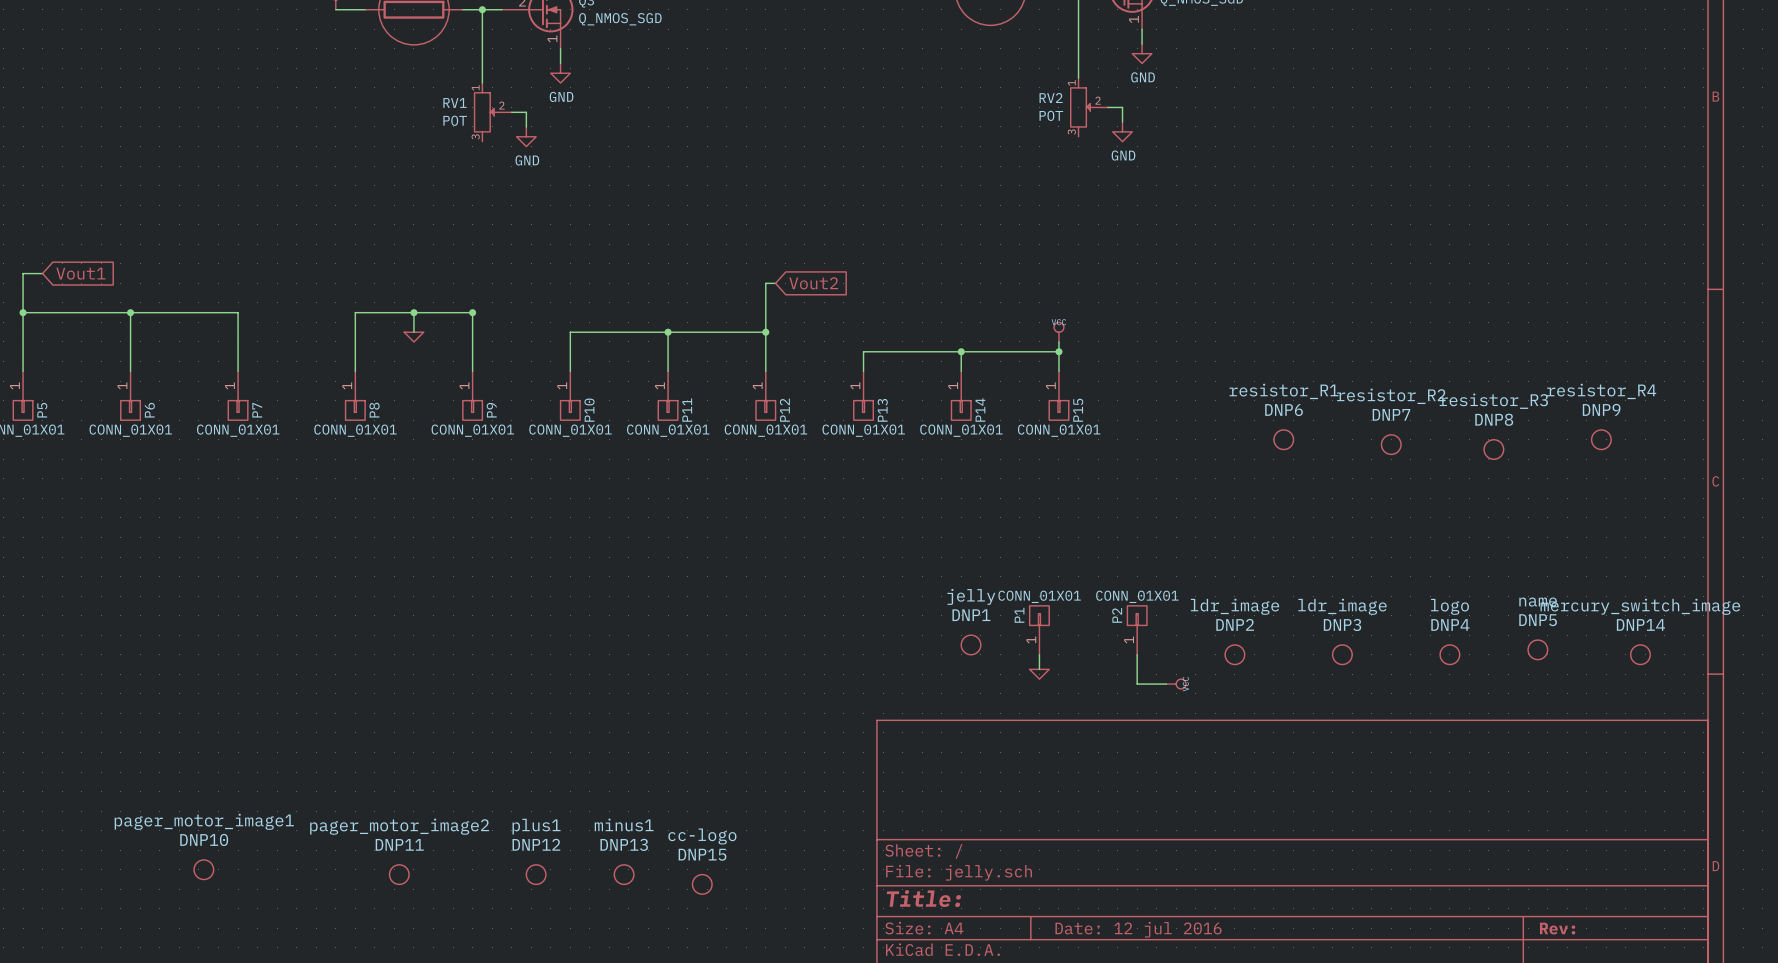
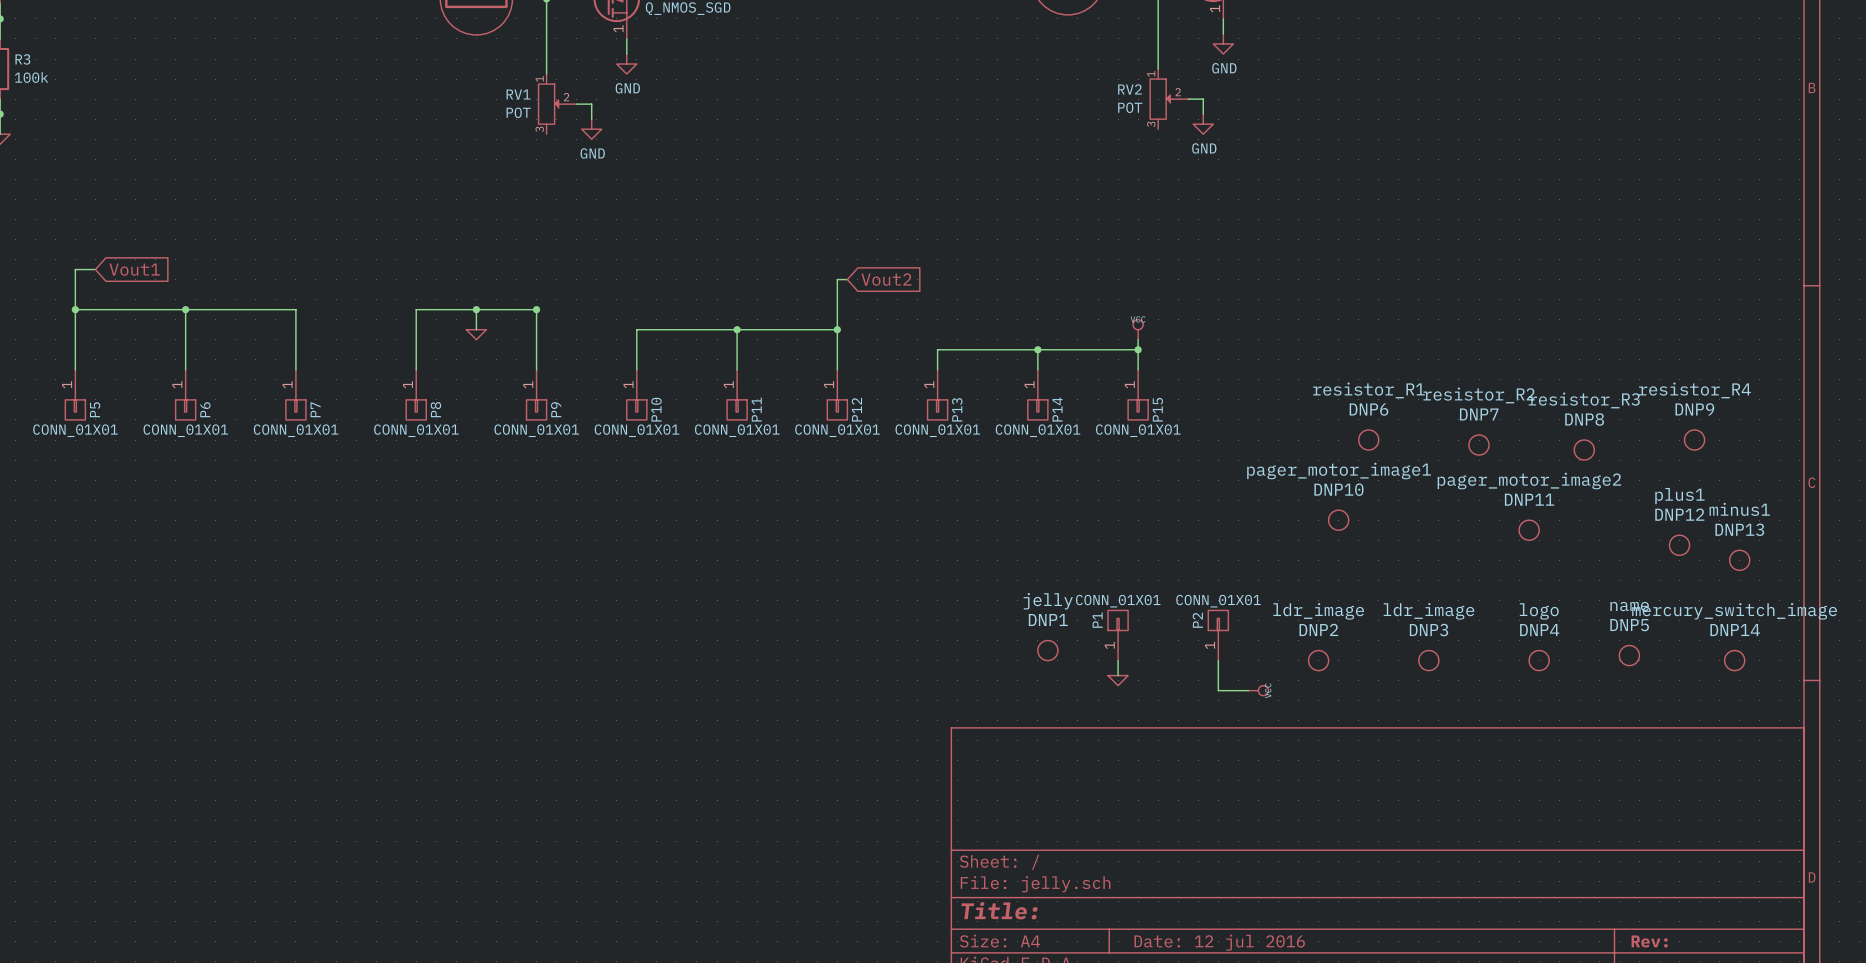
DNP10 position: (203, 869) -> (1338, 520)
DNP11 position: (399, 874) -> (1529, 530)
DNP12 position: (536, 874) -> (1679, 545)
DNP13 position: (624, 874) -> (1739, 560)
DNP15: cc-logo (702, 884) -> none

